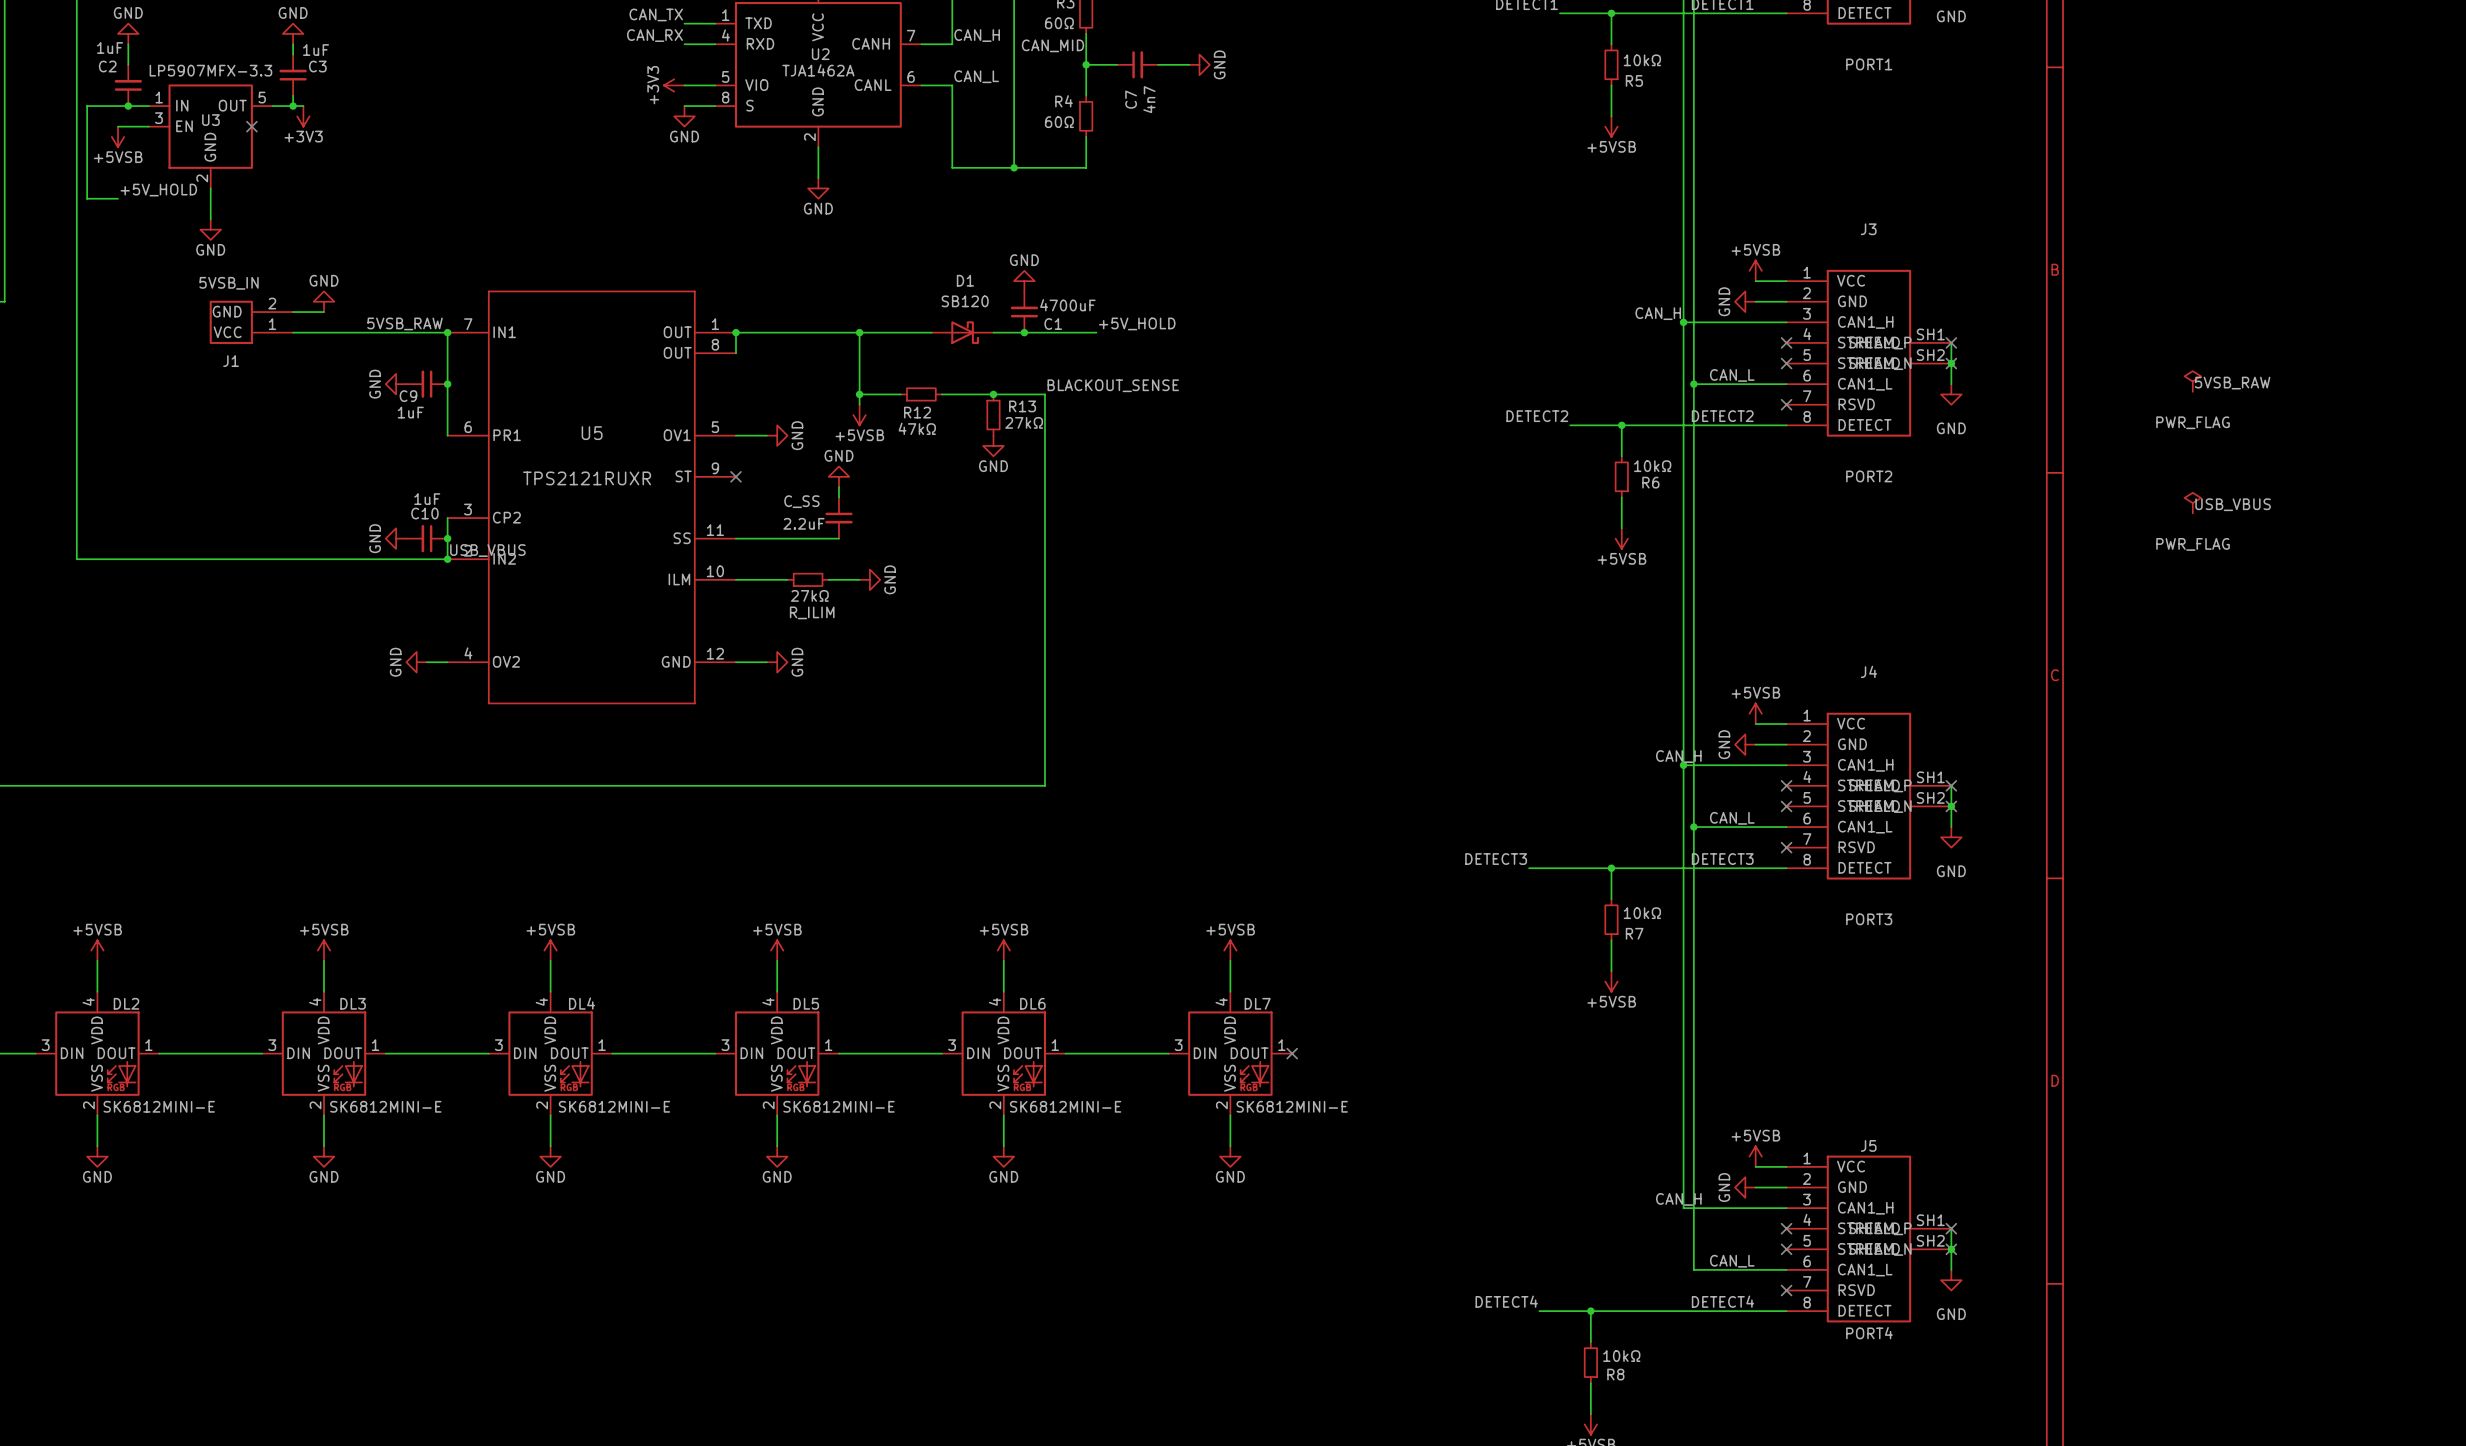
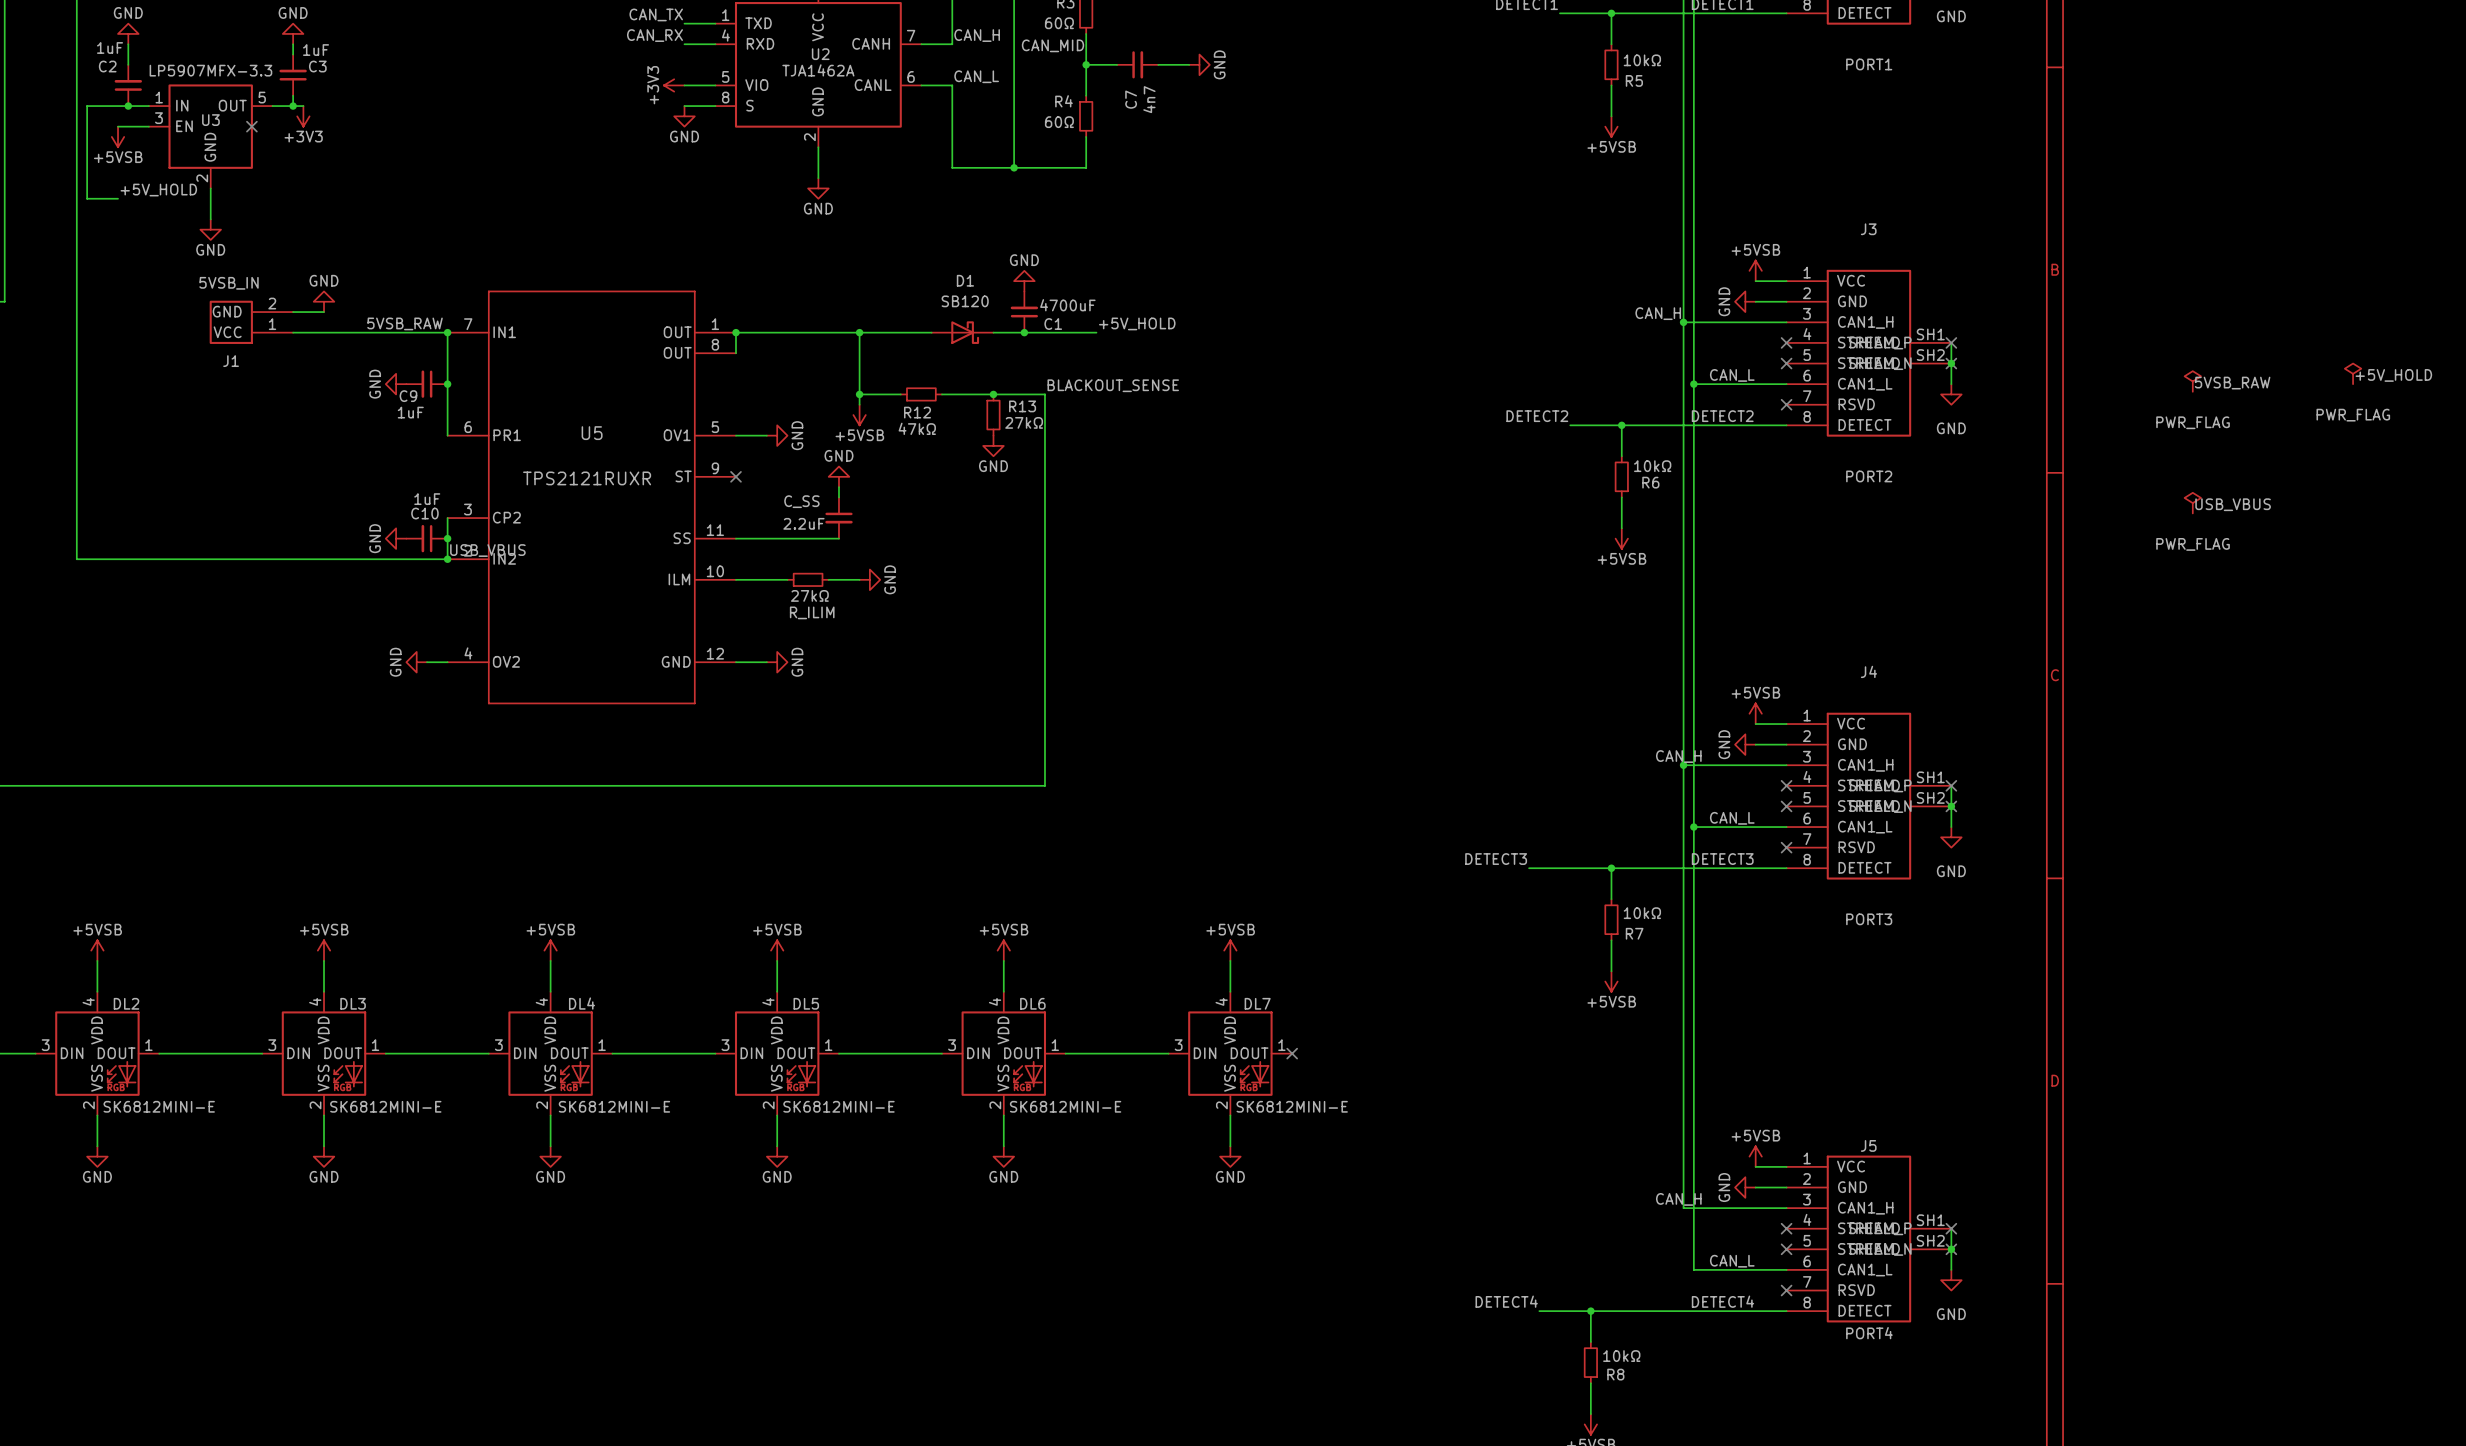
power symbol: none -> PWR_FLAG (2353, 373)
label: none -> +5V_HOLD (2393, 375)

